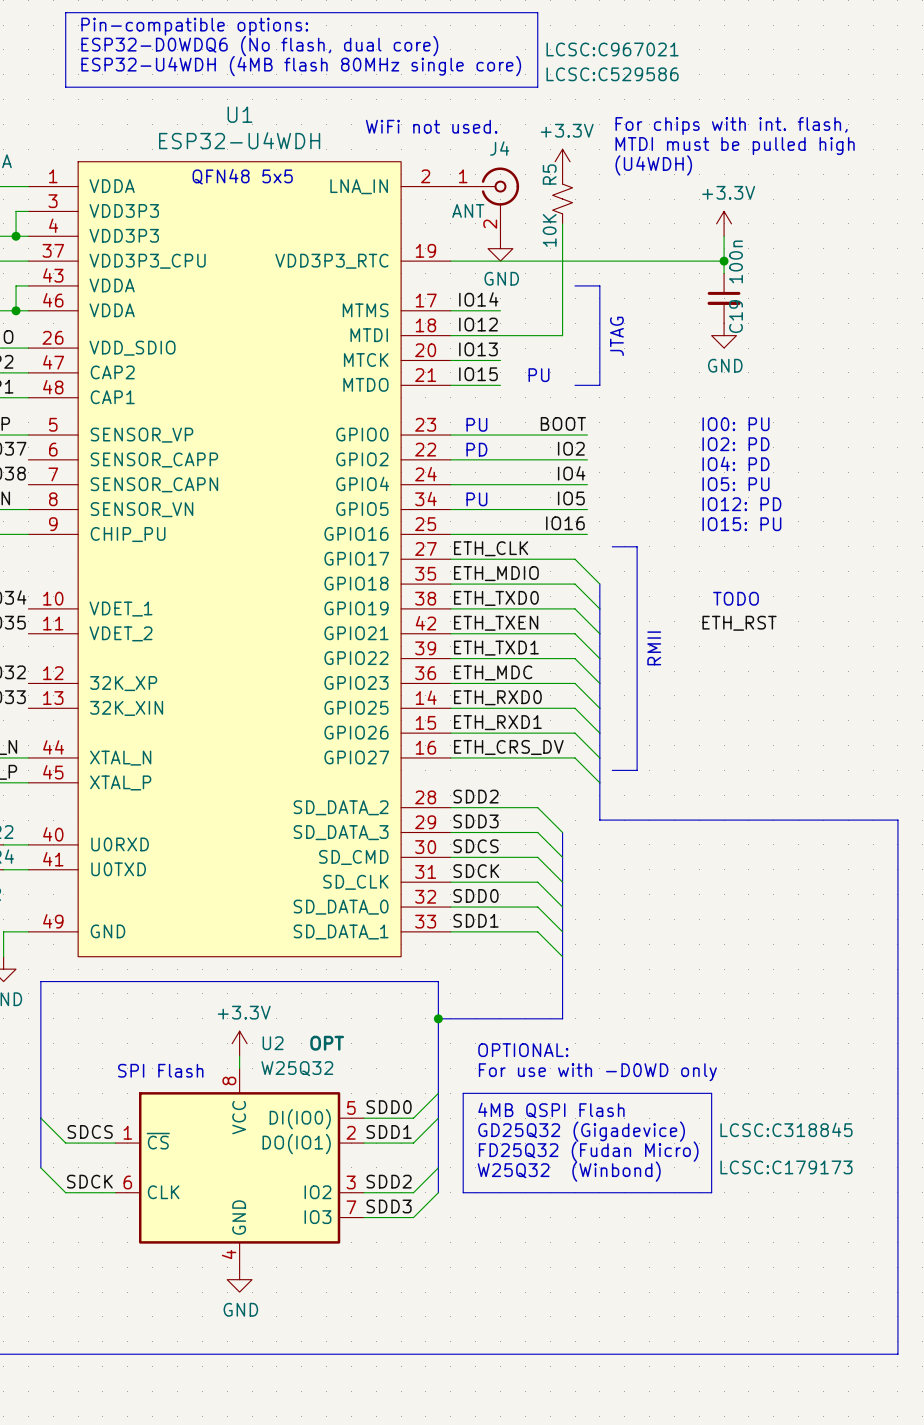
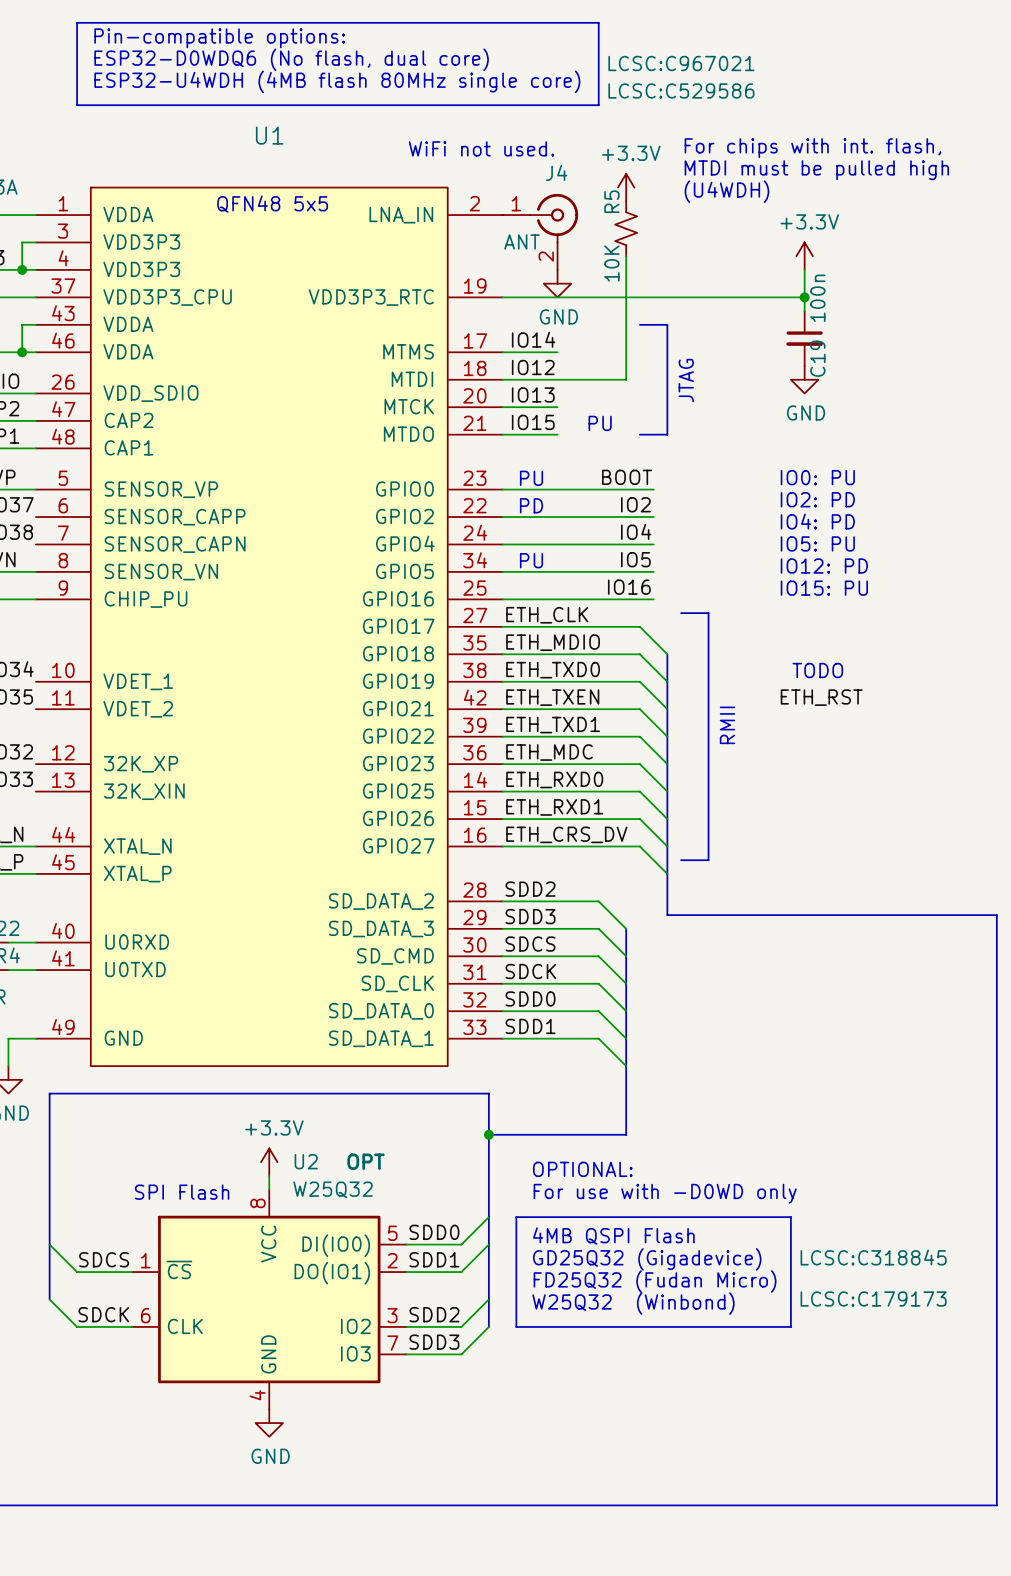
U1 value: ESP32-U4WDH (239, 140) -> none

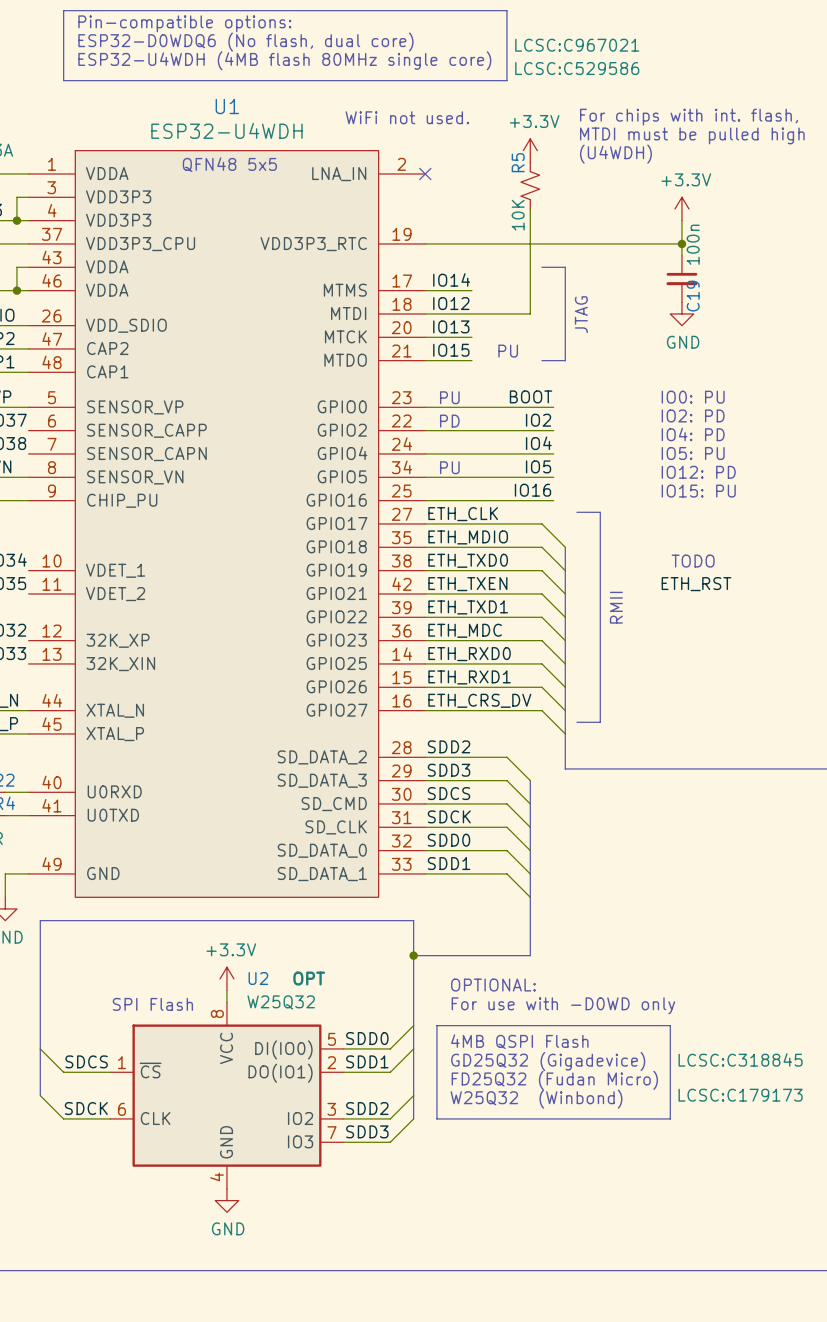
U1 value: none -> ESP32-U4WDH (226, 130)
no-connect mark: none -> (425, 173)
J4: ANT (540, 231) -> none
power symbol: GND (557, 283) -> none

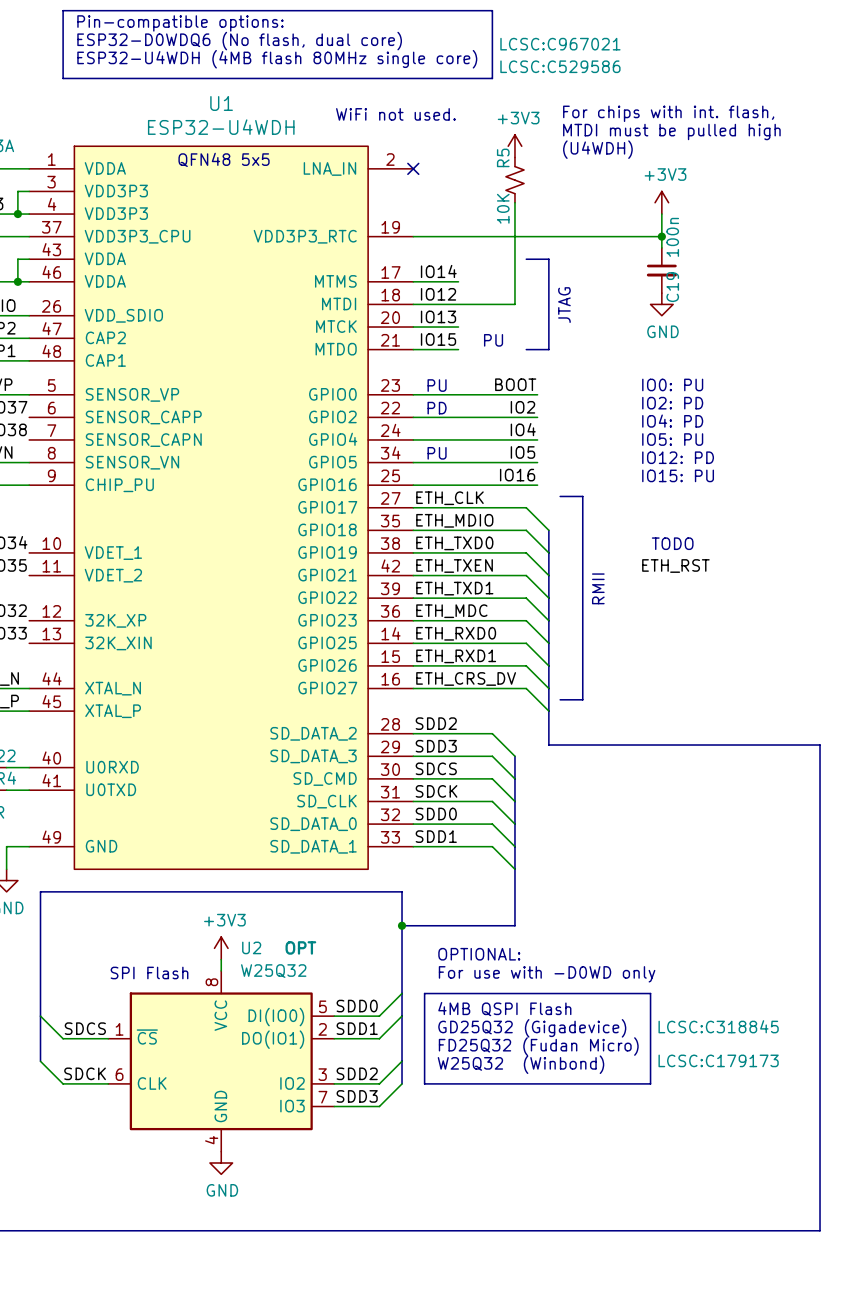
power symbol: +3.3V (530, 150) -> +3V3 (514, 146)
power symbol: +3.3V (681, 208) -> +3V3 (661, 202)
power symbol: +3.3V (226, 978) -> +3V3 (221, 948)

